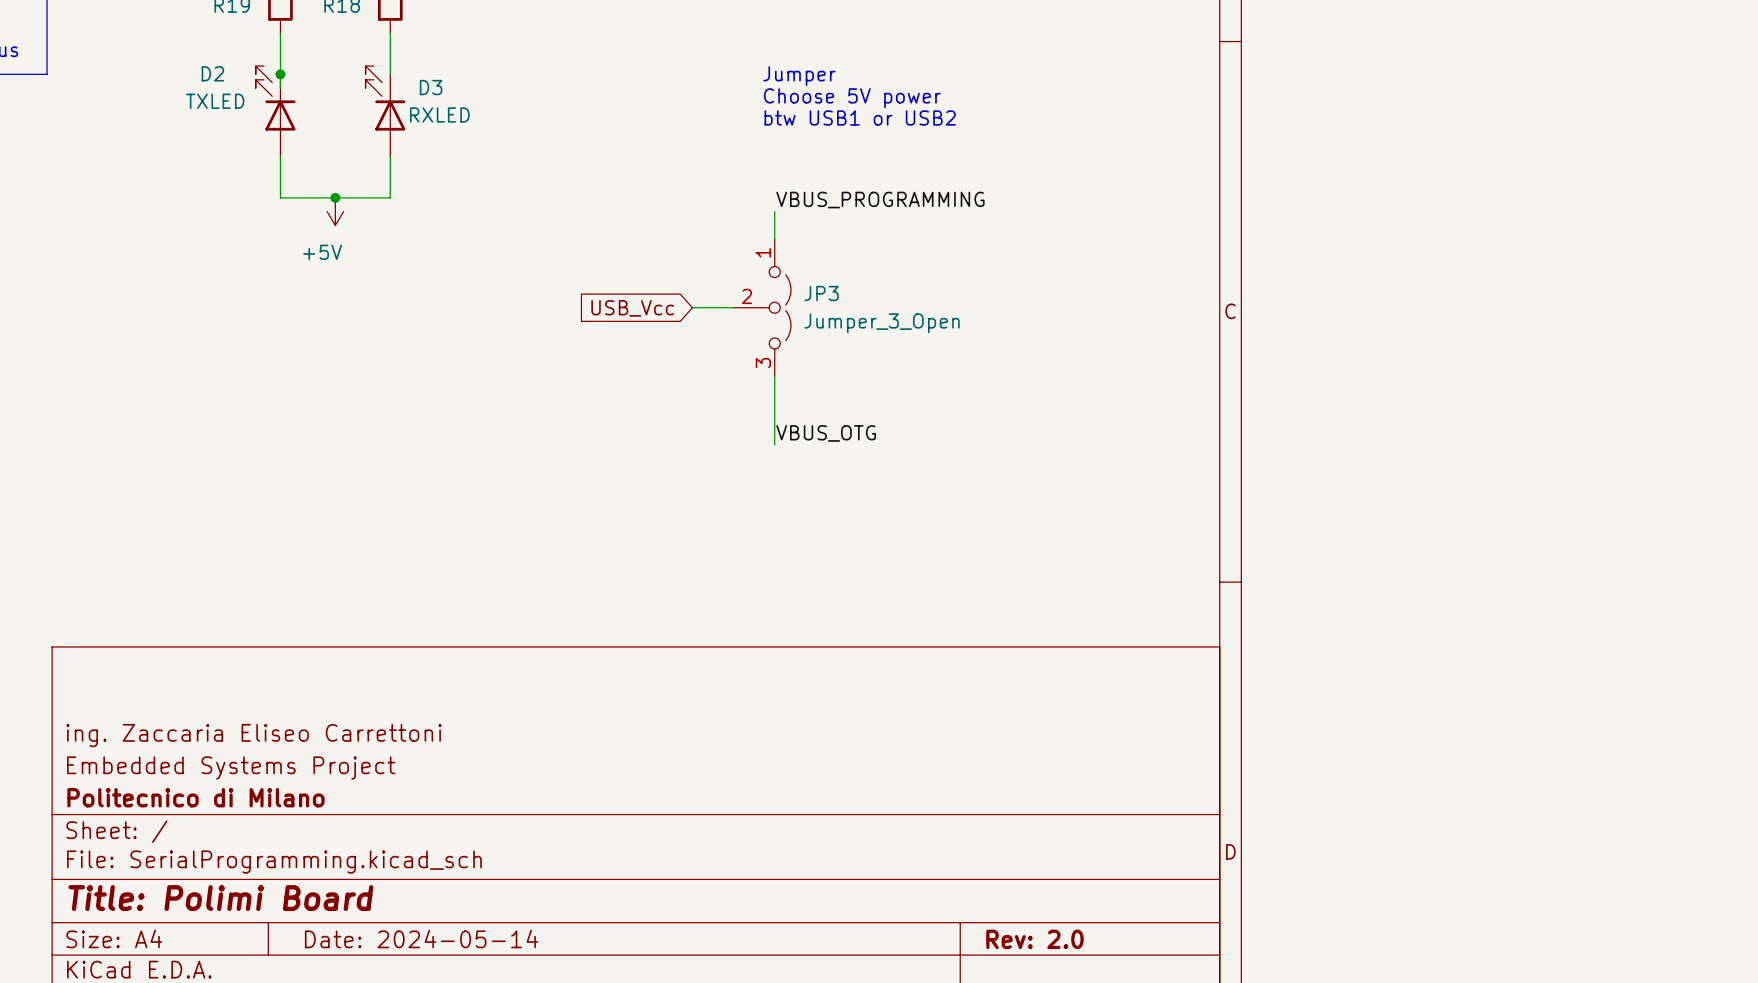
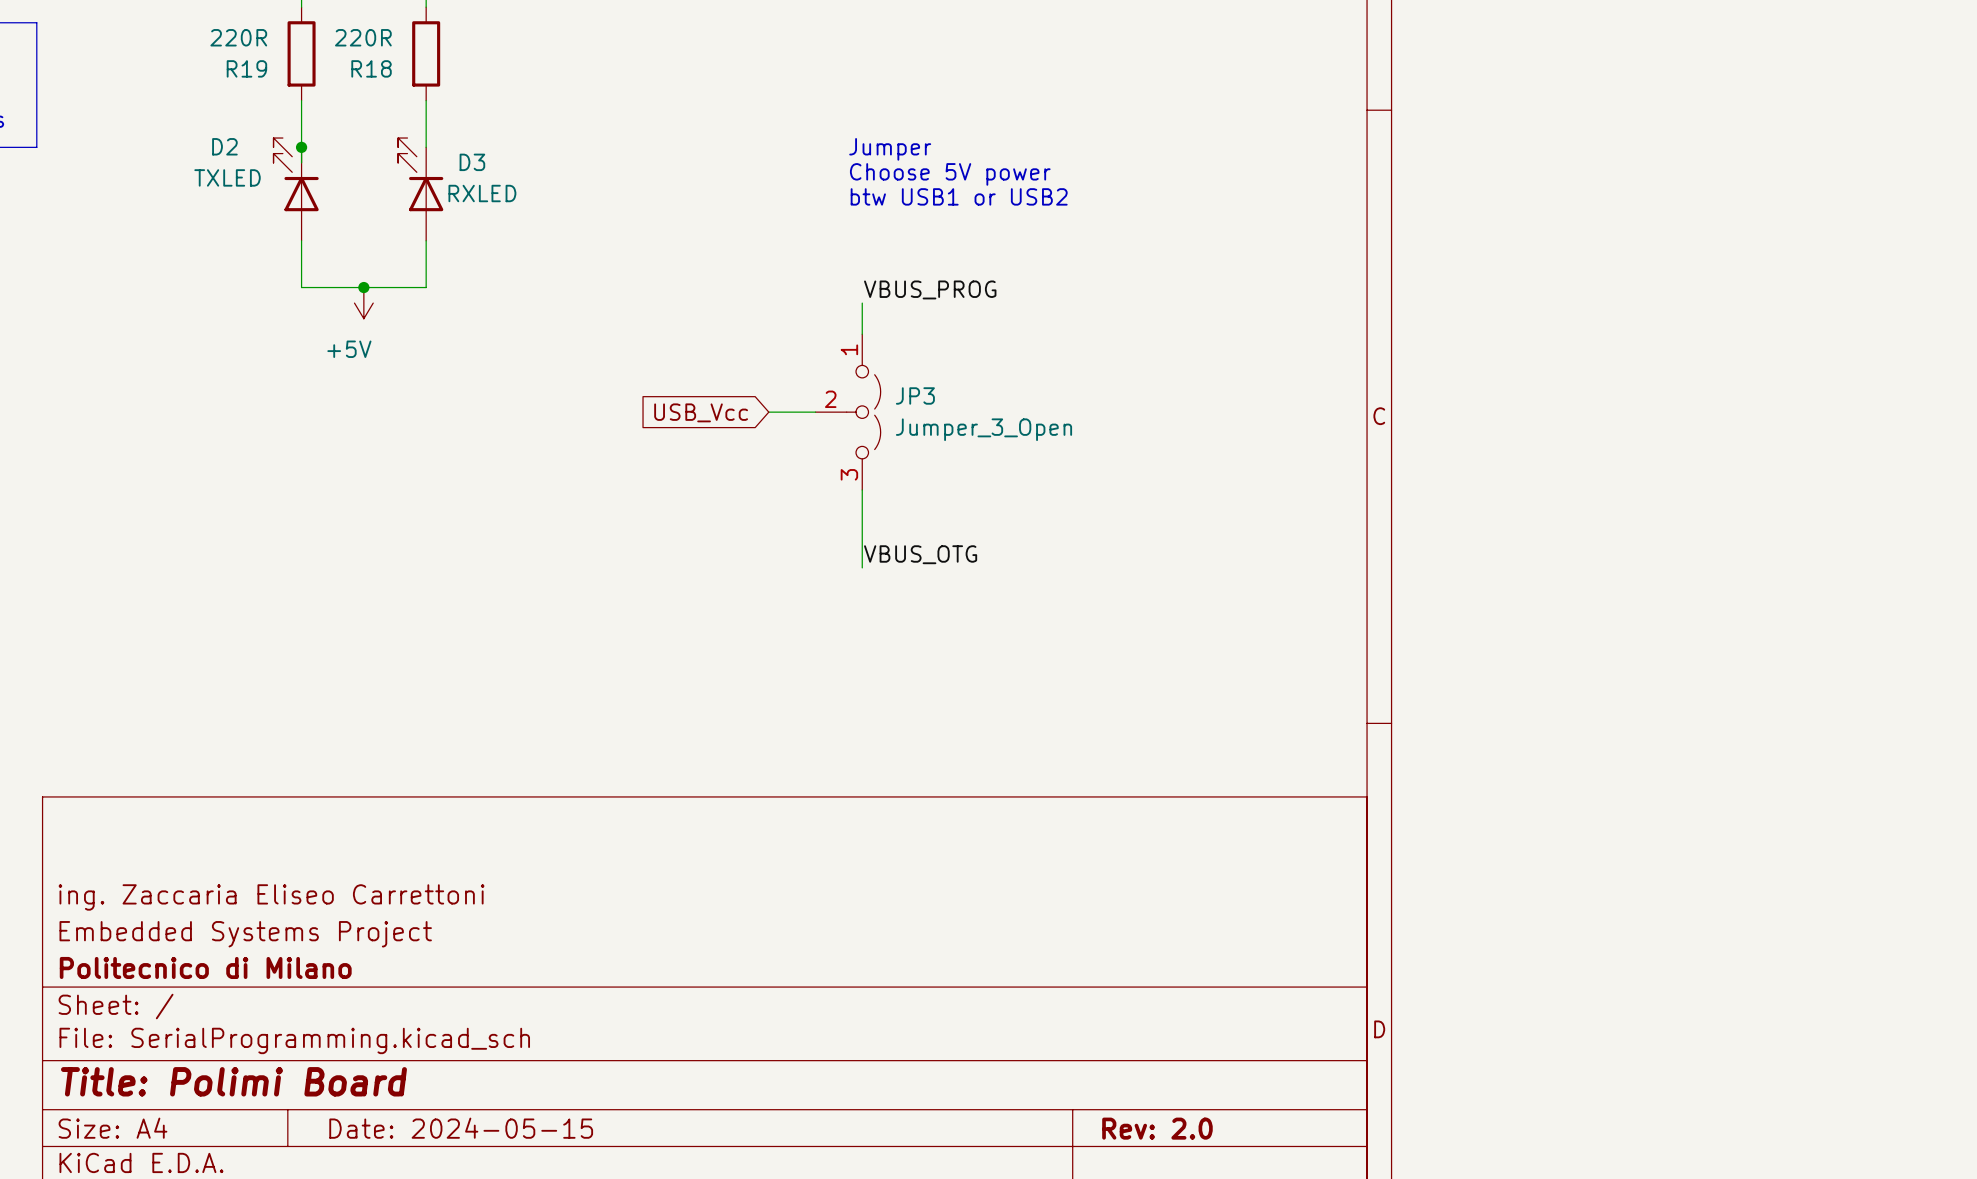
label: VBUS_PROGRAMMING (880, 200) -> VBUS_PROG (930, 289)
title block: Date: 2024-05-14 (421, 938) -> Date: 2024-05-15 (461, 1128)

